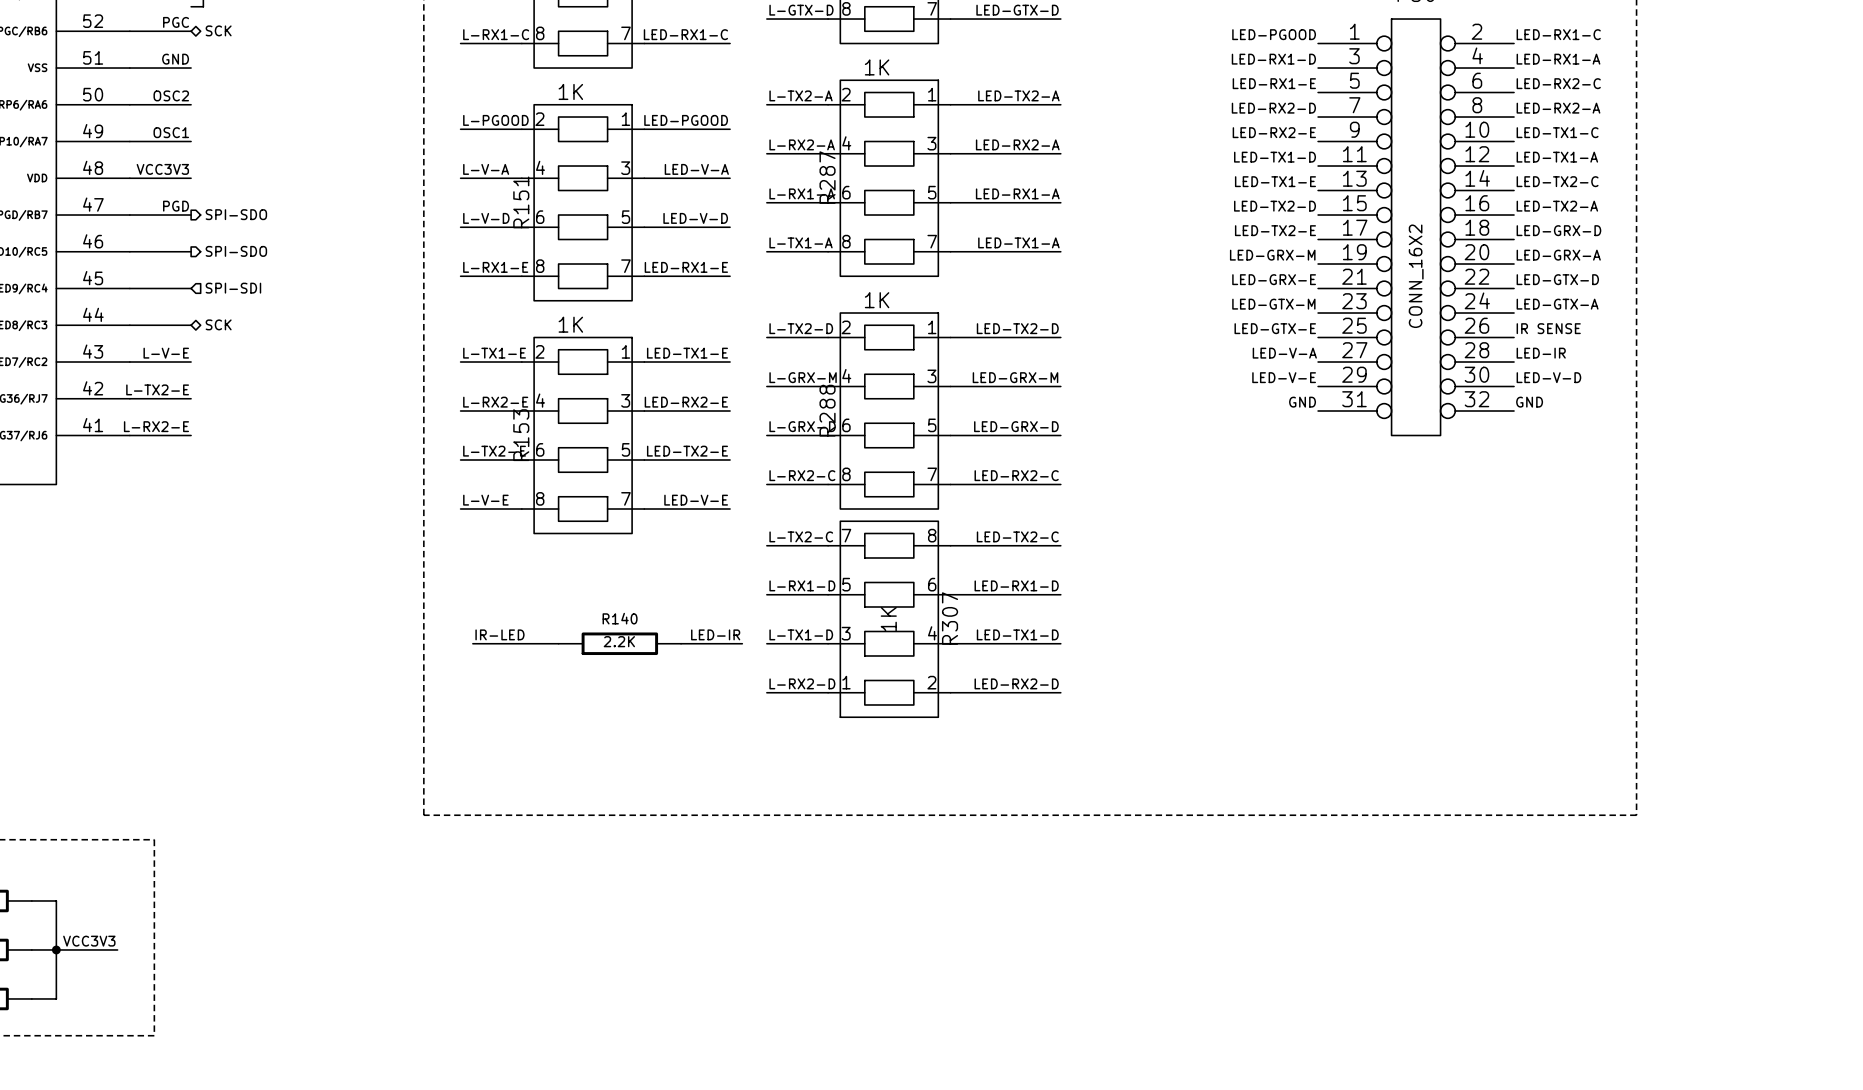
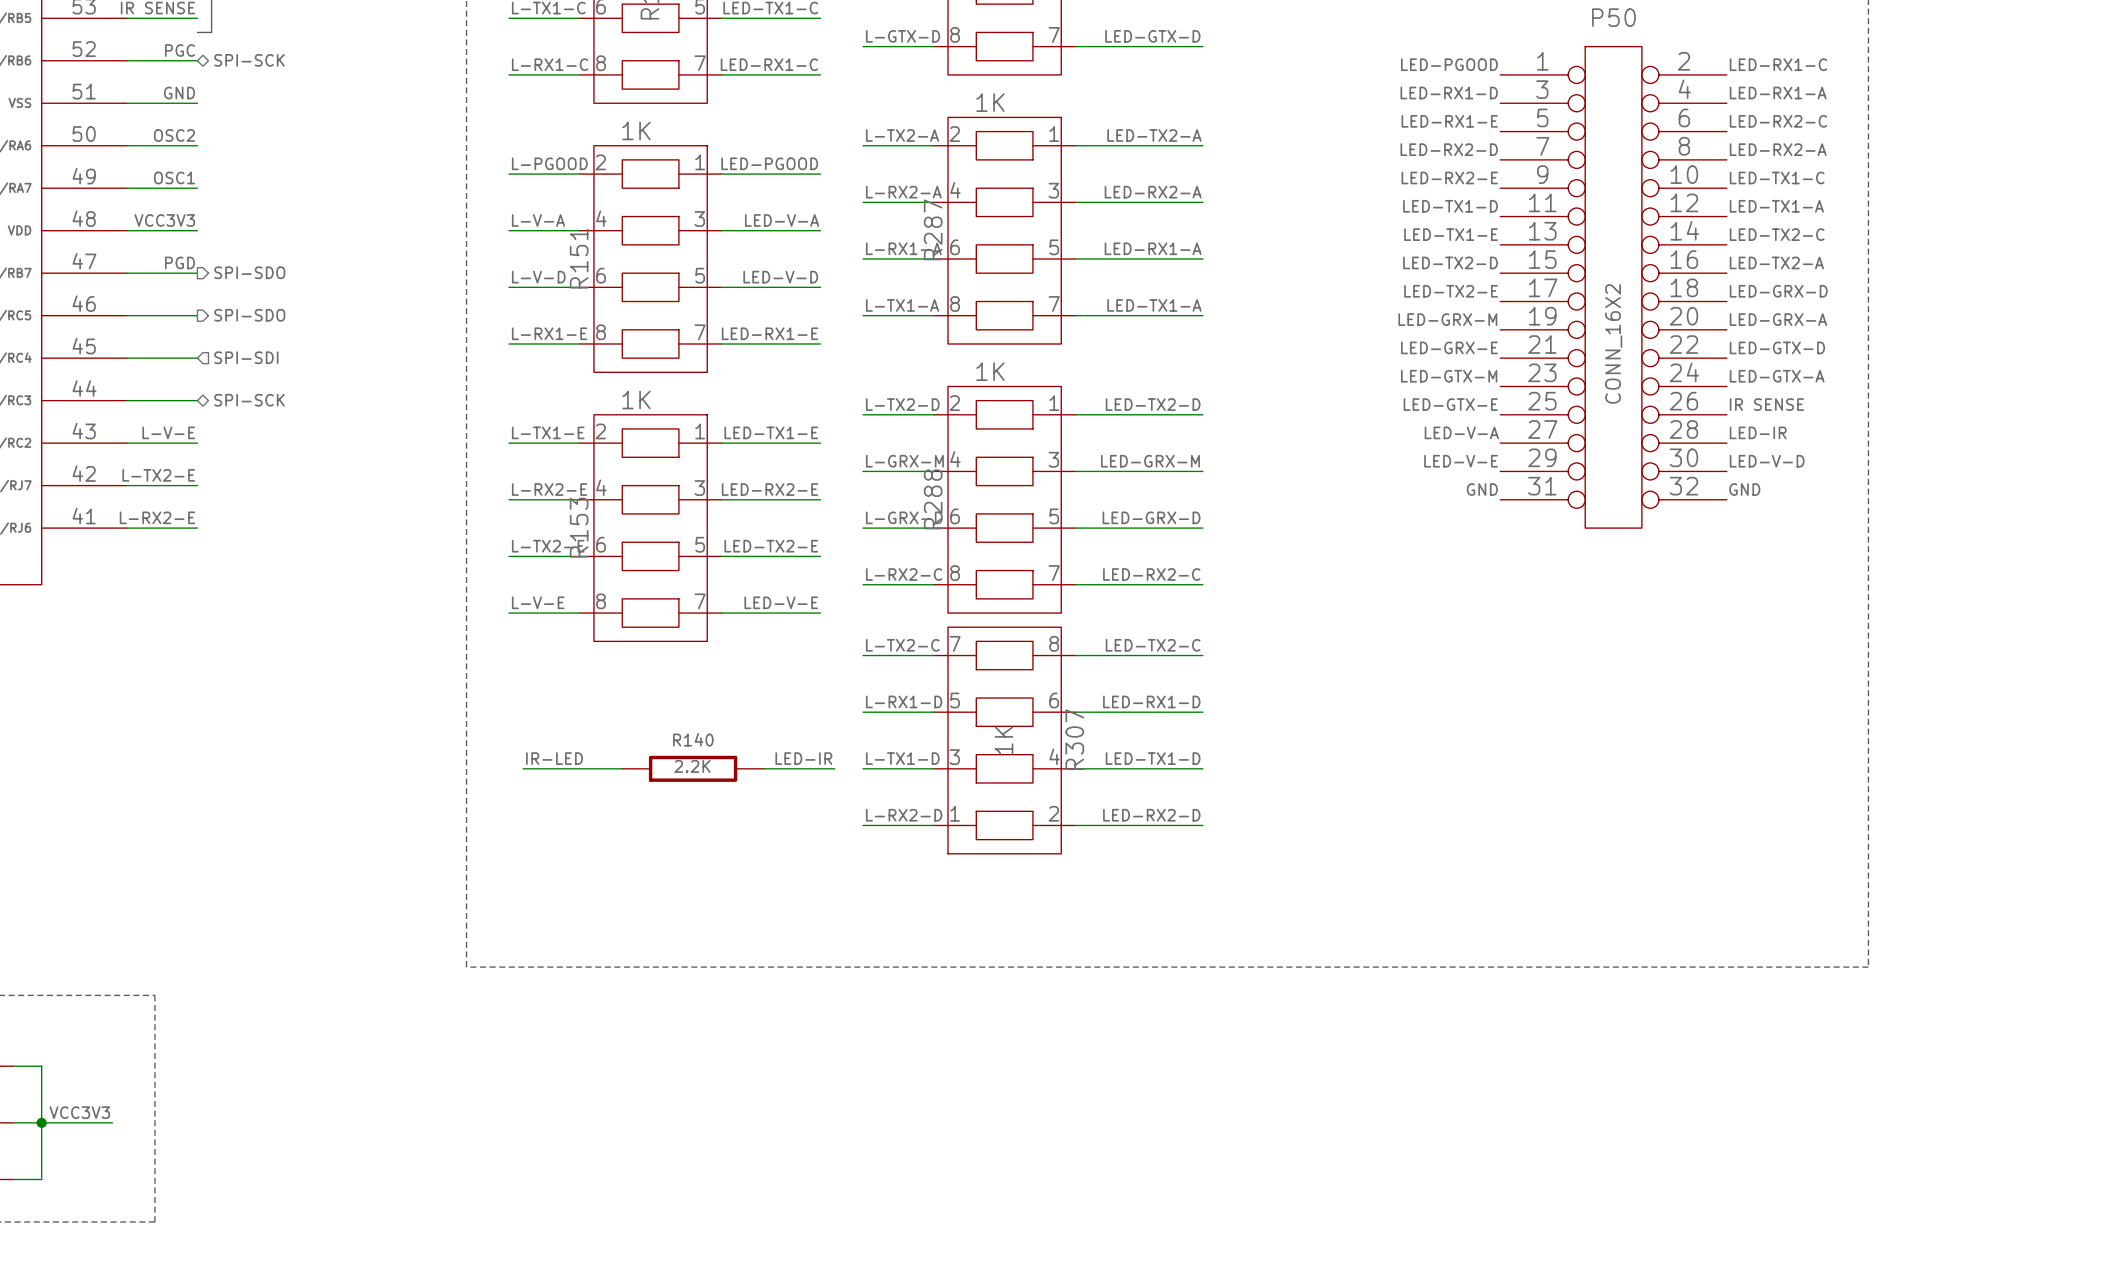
hierarchical label: SCK (218, 30) -> SPI-SCK (249, 60)
hierarchical label: SCK (218, 324) -> SPI-SCK (249, 400)

